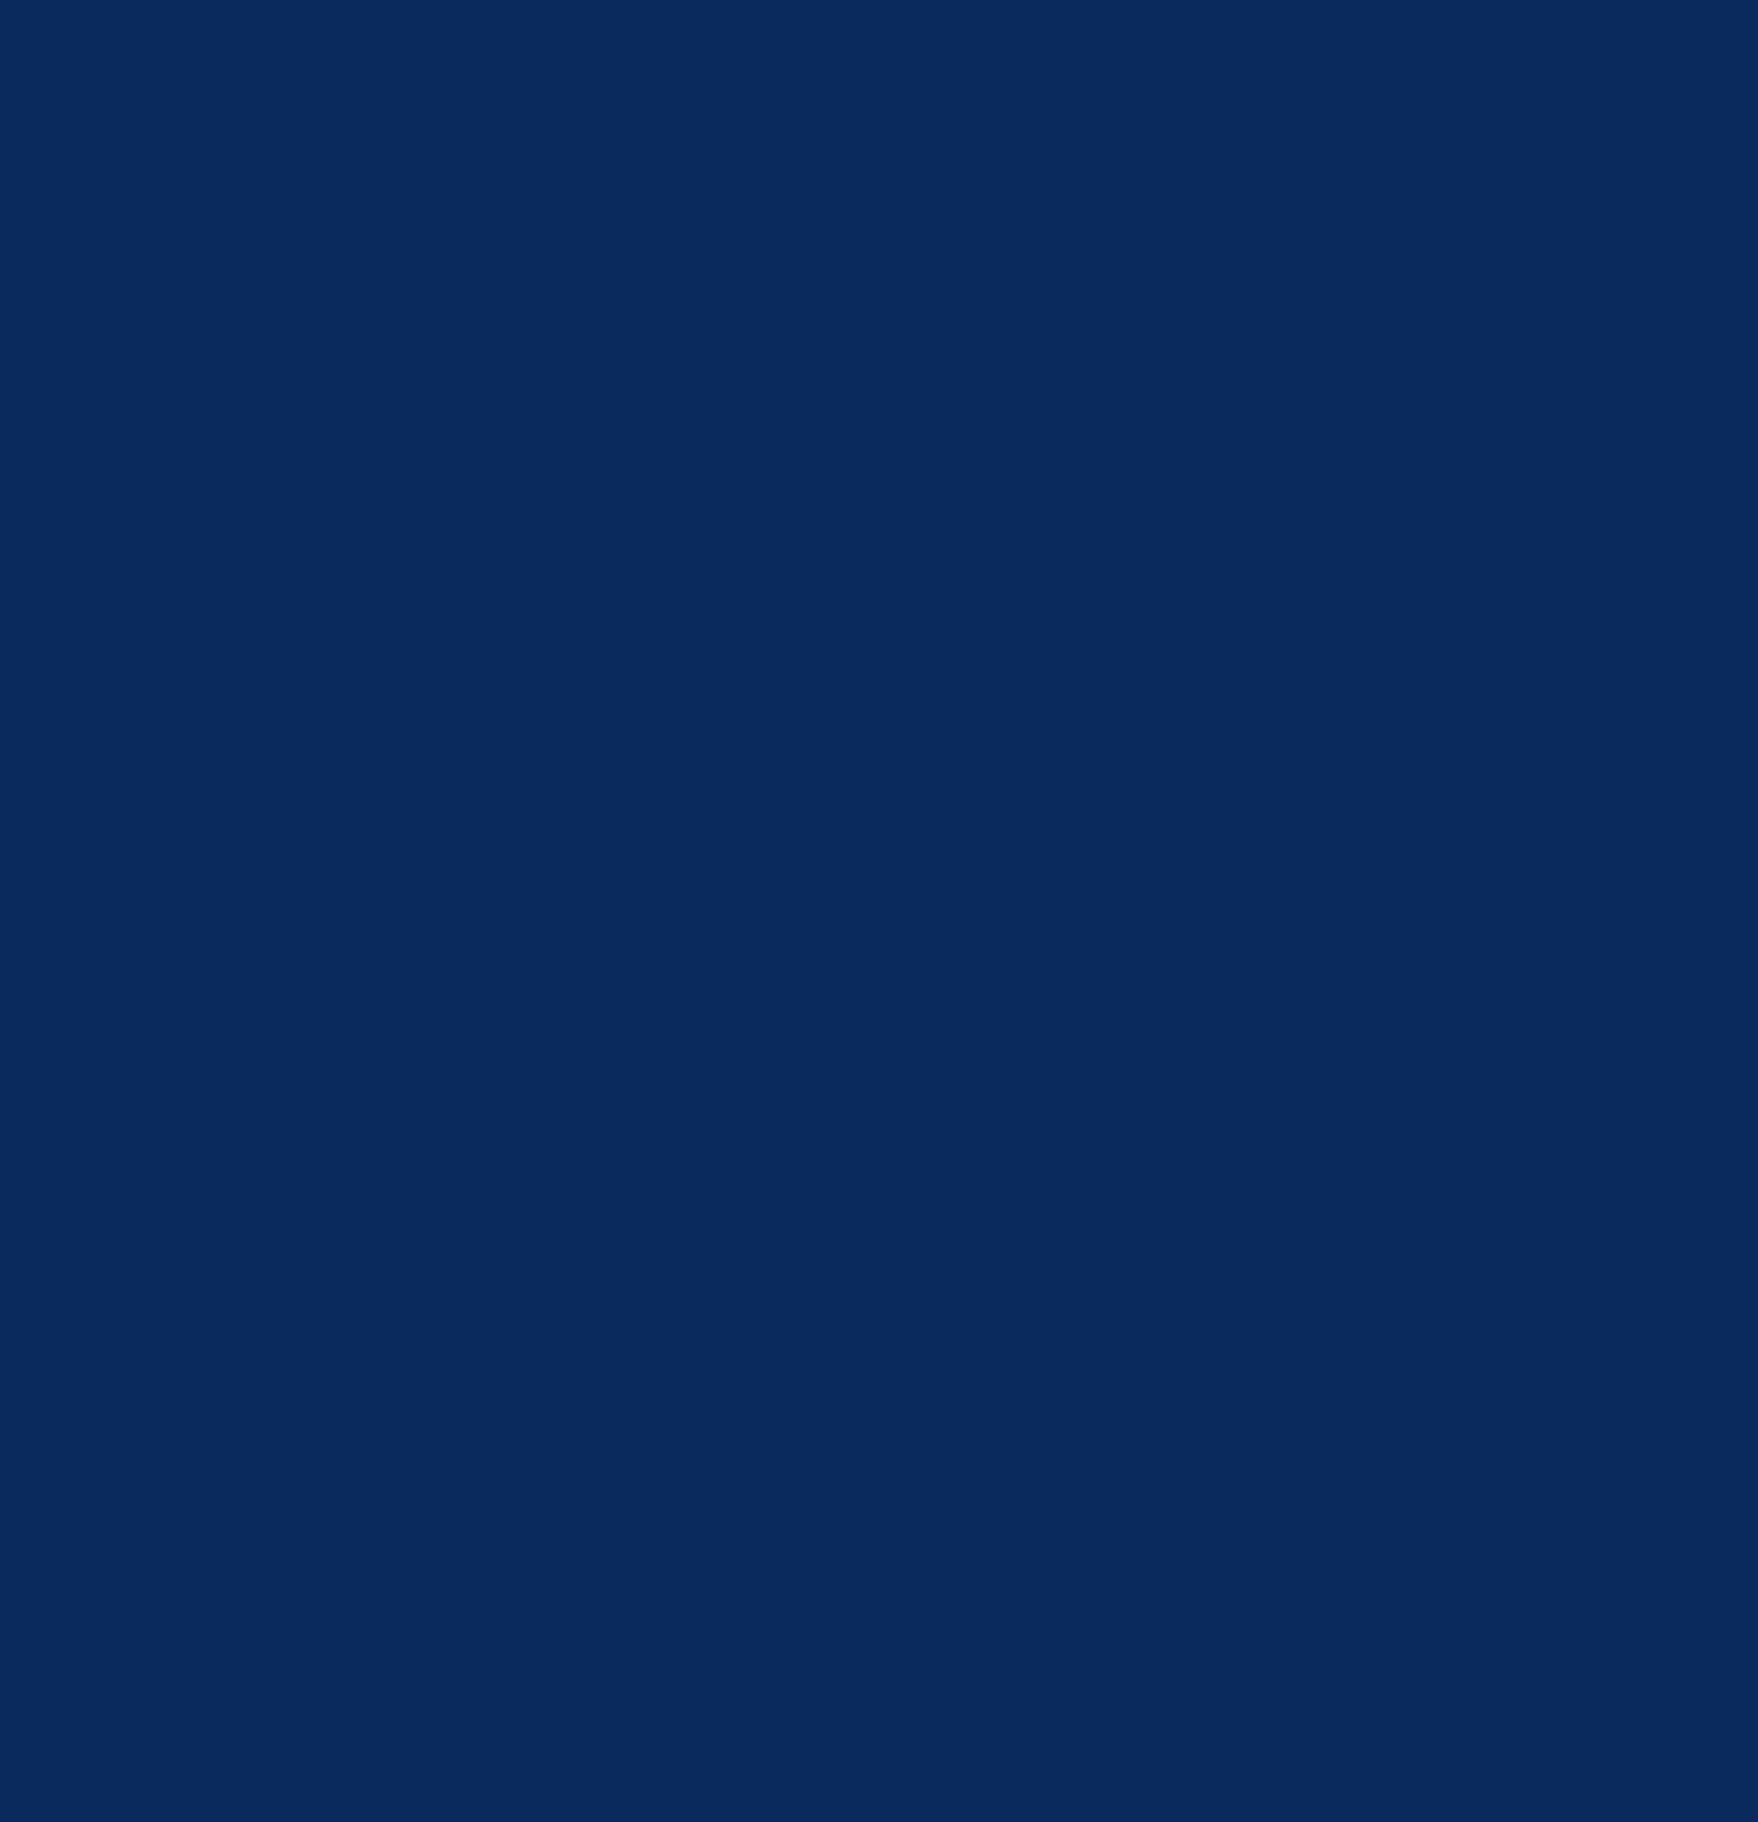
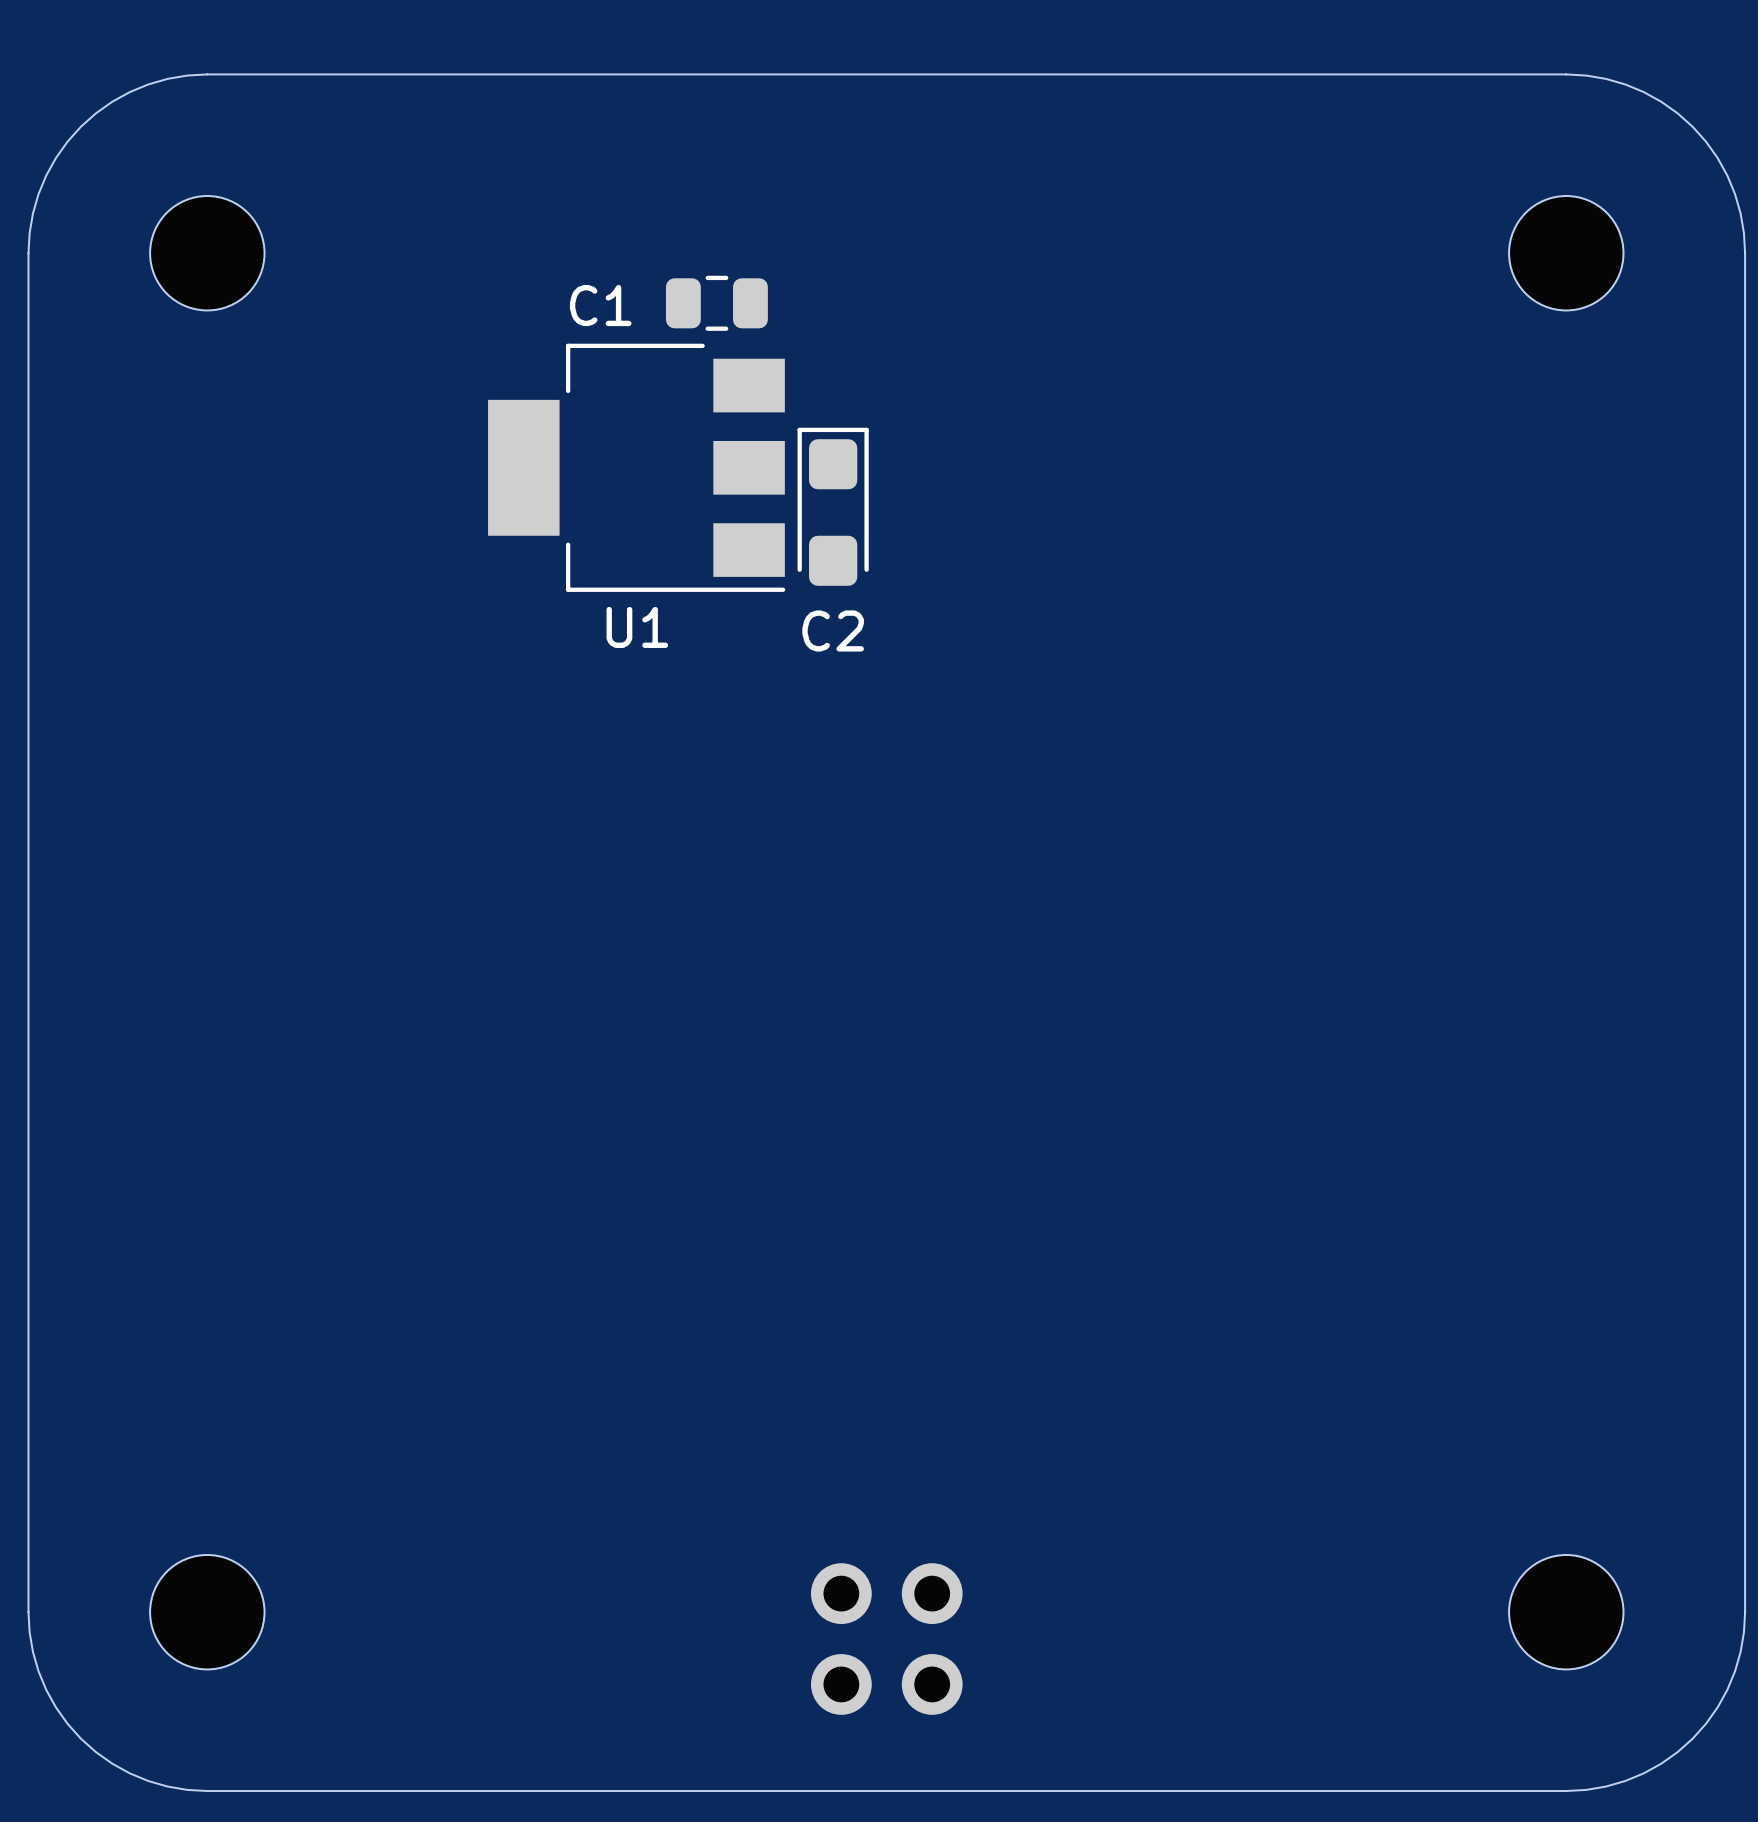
board edge: none -> (1566, 74) (207, 74) (167, 78) (129, 92) (95, 113) (67, 141) (55, 158) (38, 194) (29, 233) (28, 253) (28, 1612) (32, 1652) (46, 1689) (67, 1723) (95, 1752) (112, 1763) (148, 1780) (187, 1789) (207, 1791) (1566, 1791) (1606, 1786) (1643, 1773) (1677, 1752) (1706, 1723) (1717, 1707) (1735, 1671) (1743, 1632) (1745, 1612) (1743, 233) (1735, 194) (1727, 175) (1717, 158) (1692, 126) (1677, 113) (1643, 92) (1606, 78) (1566, 74)
part: none -> (207, 253)
part: none -> (1566, 253)
C1: none -> (716, 303)
U1: none -> (636, 467)
C2: none -> (833, 506)
part: none -> (207, 1612)
part: none -> (1566, 1612)
part: none -> (886, 1639)

